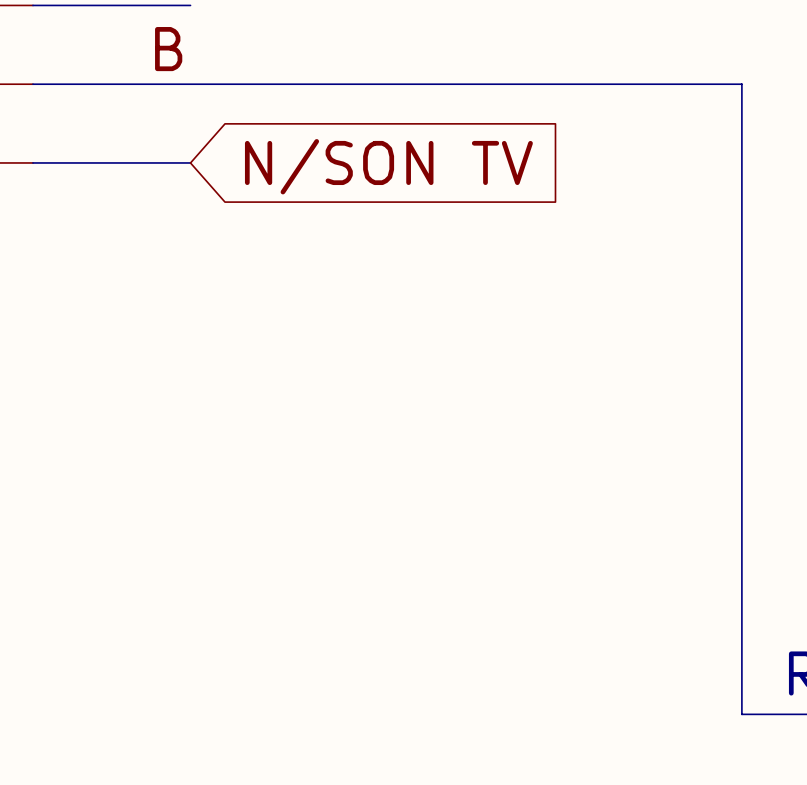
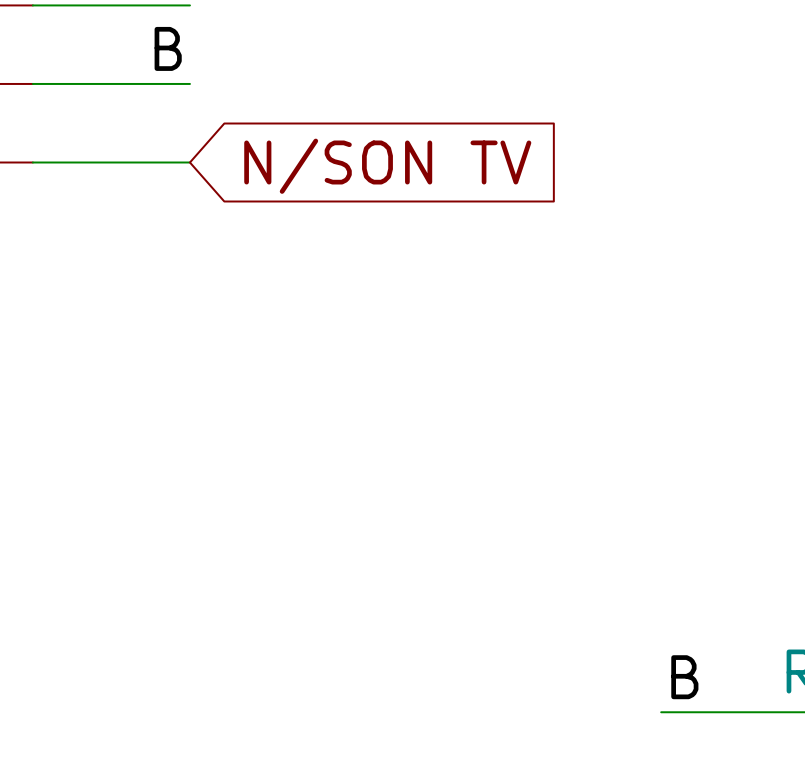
wire: (190, 84) (741, 84) (741, 714) -> (661, 712) (739, 712)
label: none -> B (684, 677)

